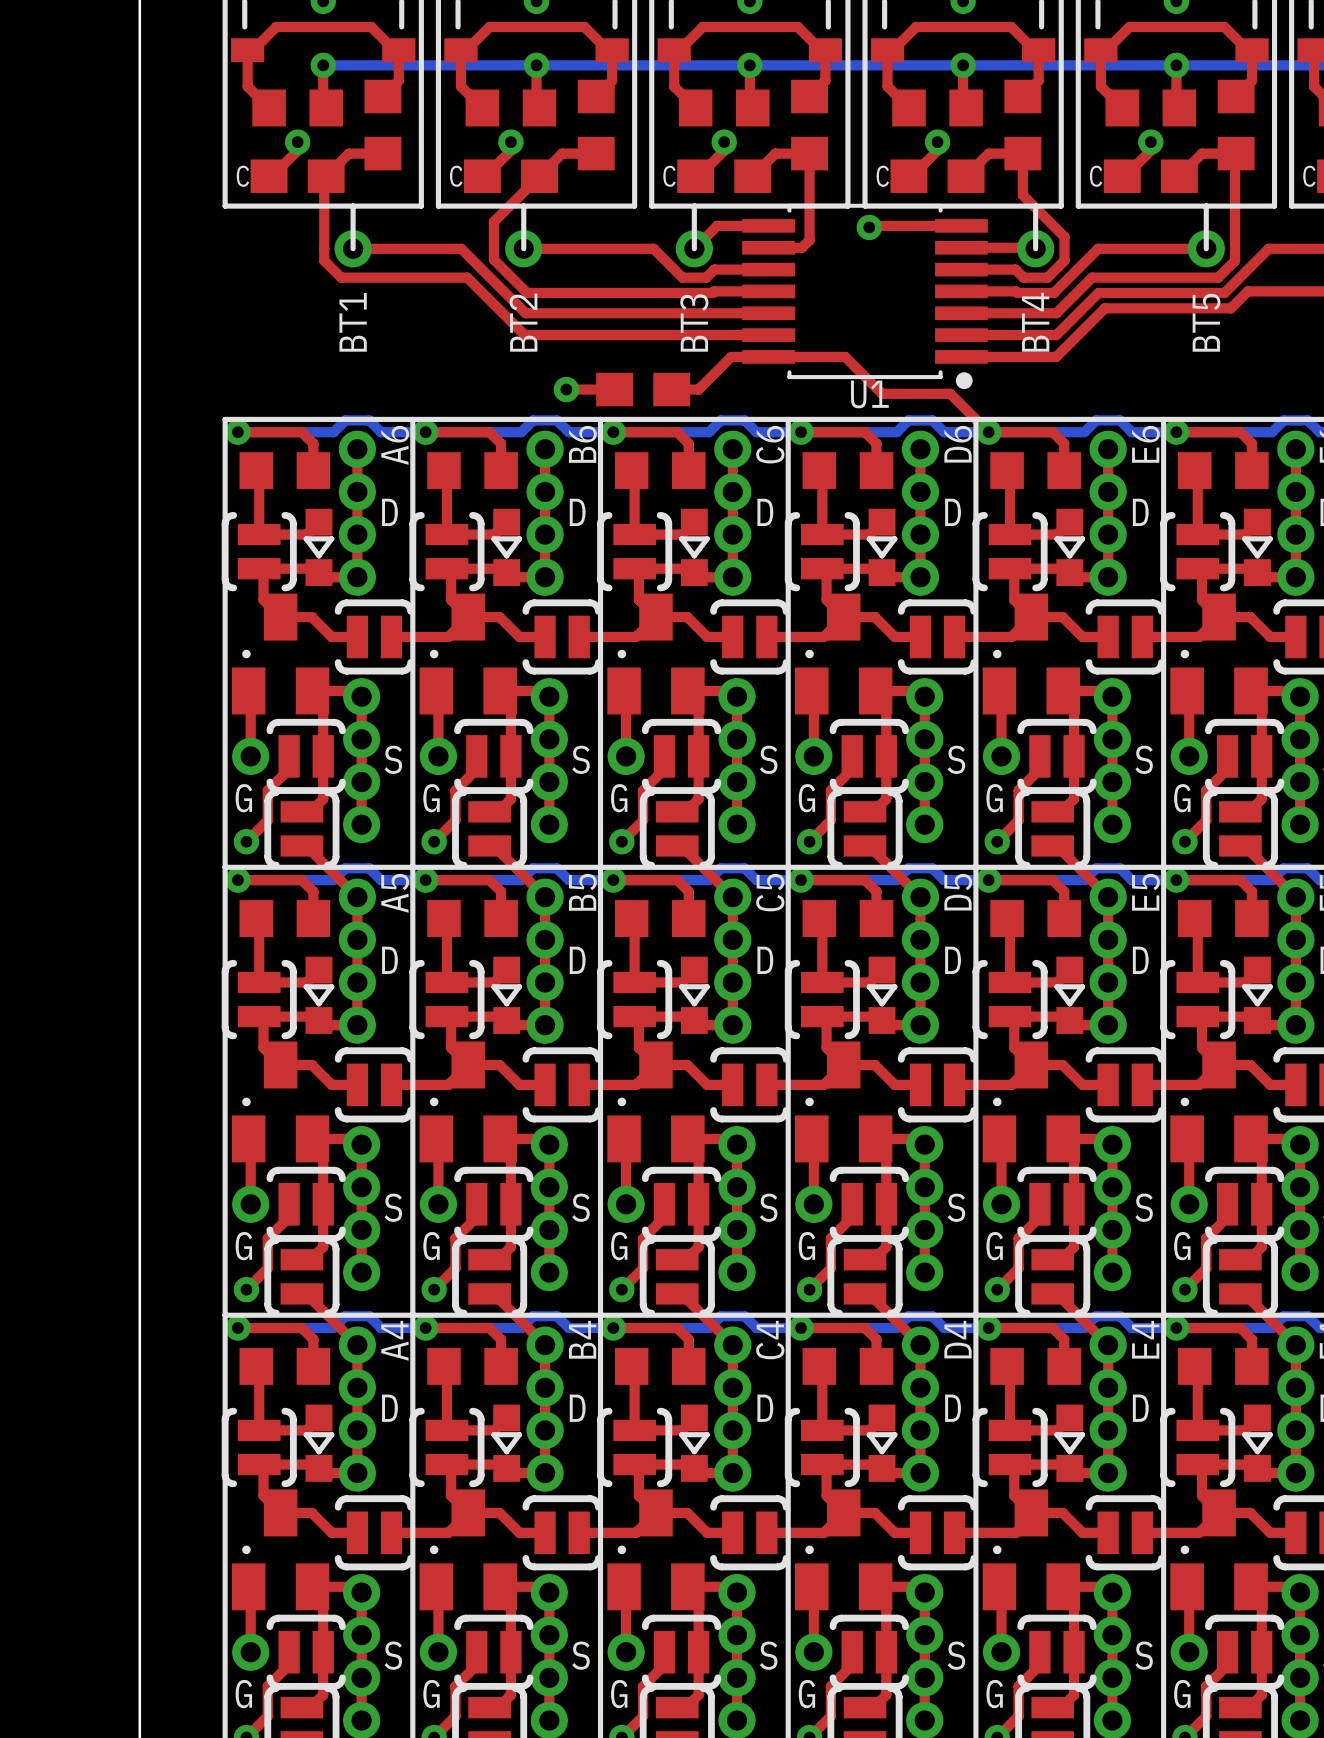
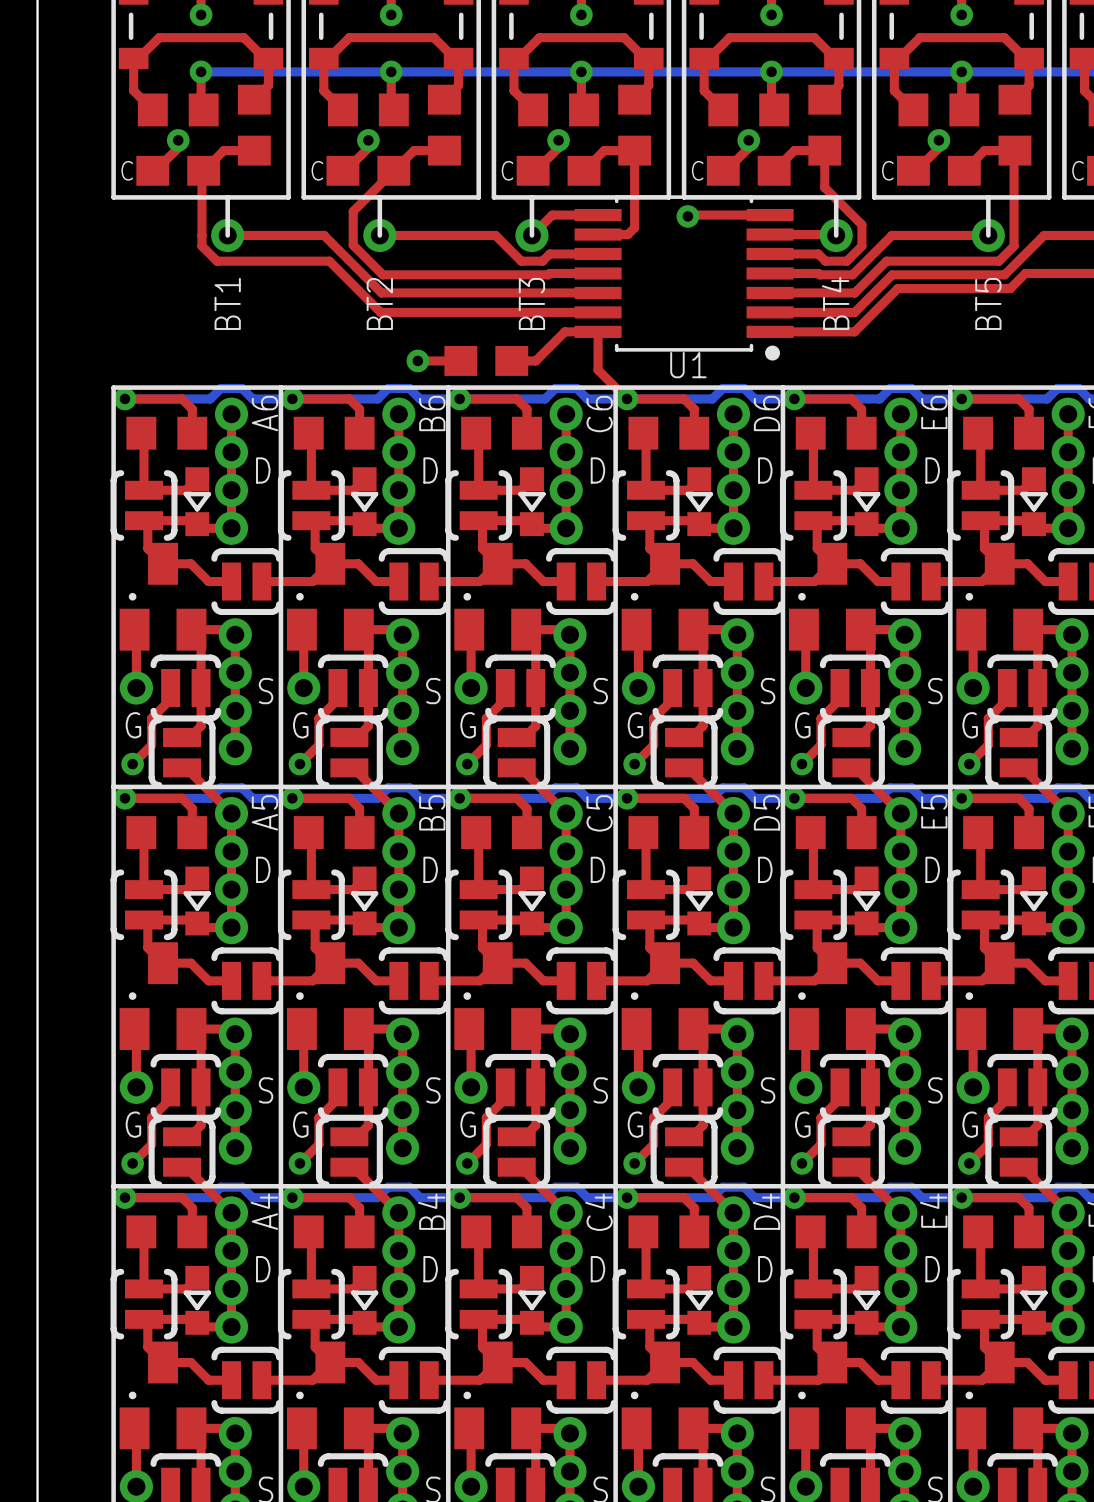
top track: (768, 356) (845, 356) (882, 393) (950, 393) (988, 432) -> (598, 331) (598, 370) (627, 398)

